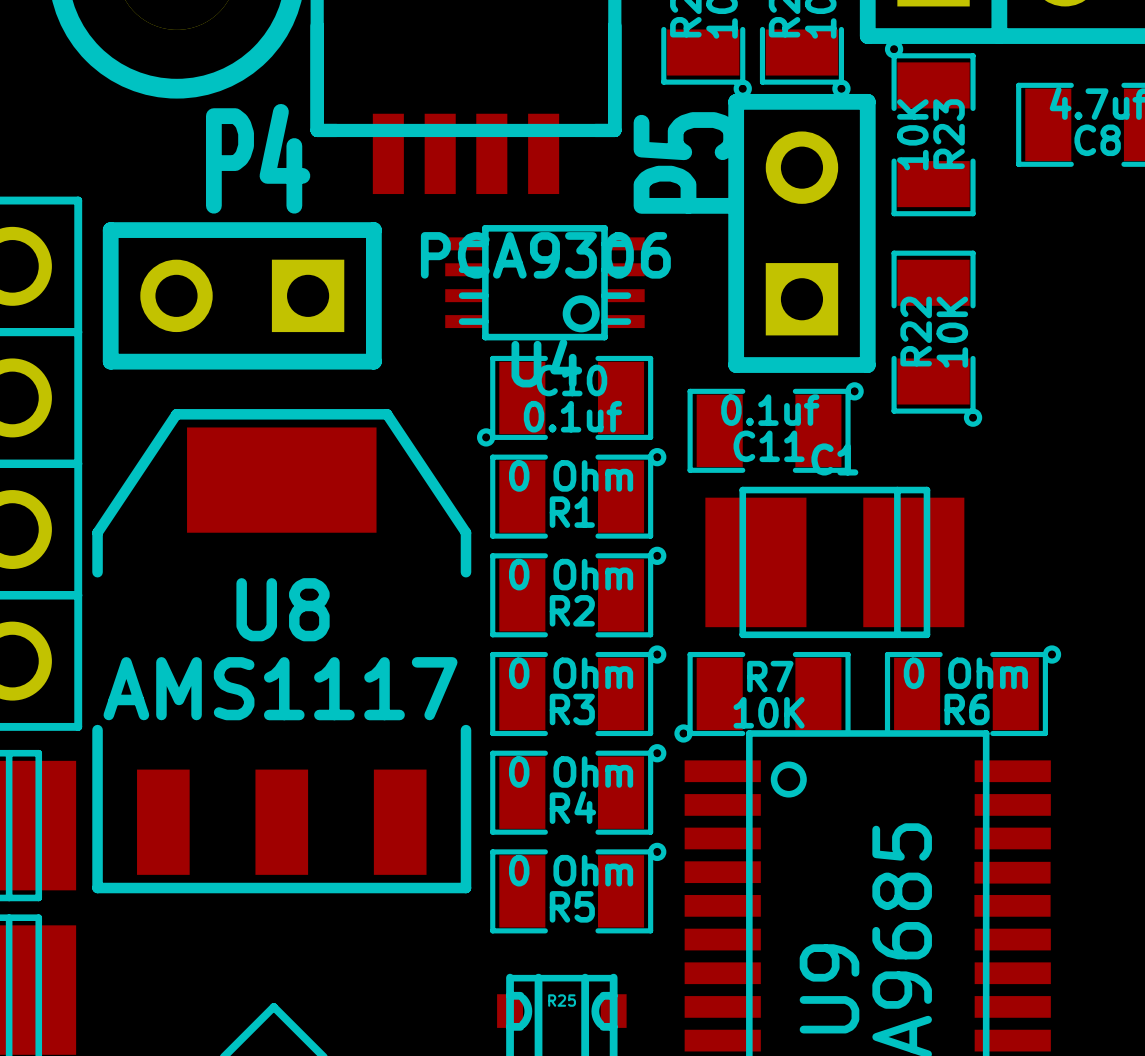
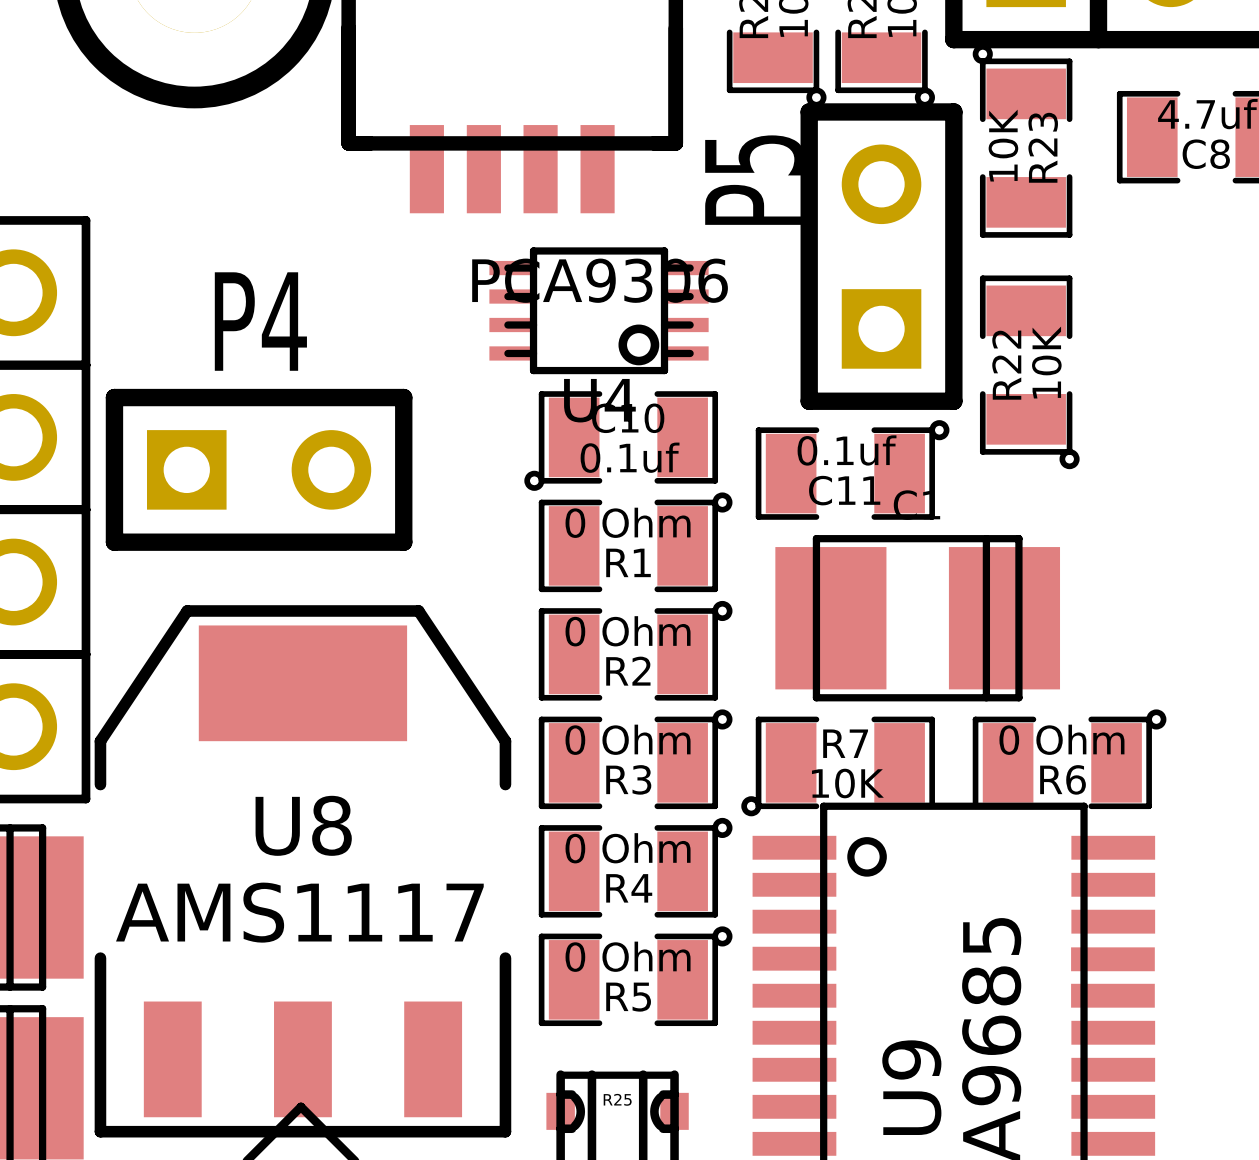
P4 rotation: 0° (242, 295) -> 180° (259, 469)
U8 position: (281, 651) -> (302, 871)

